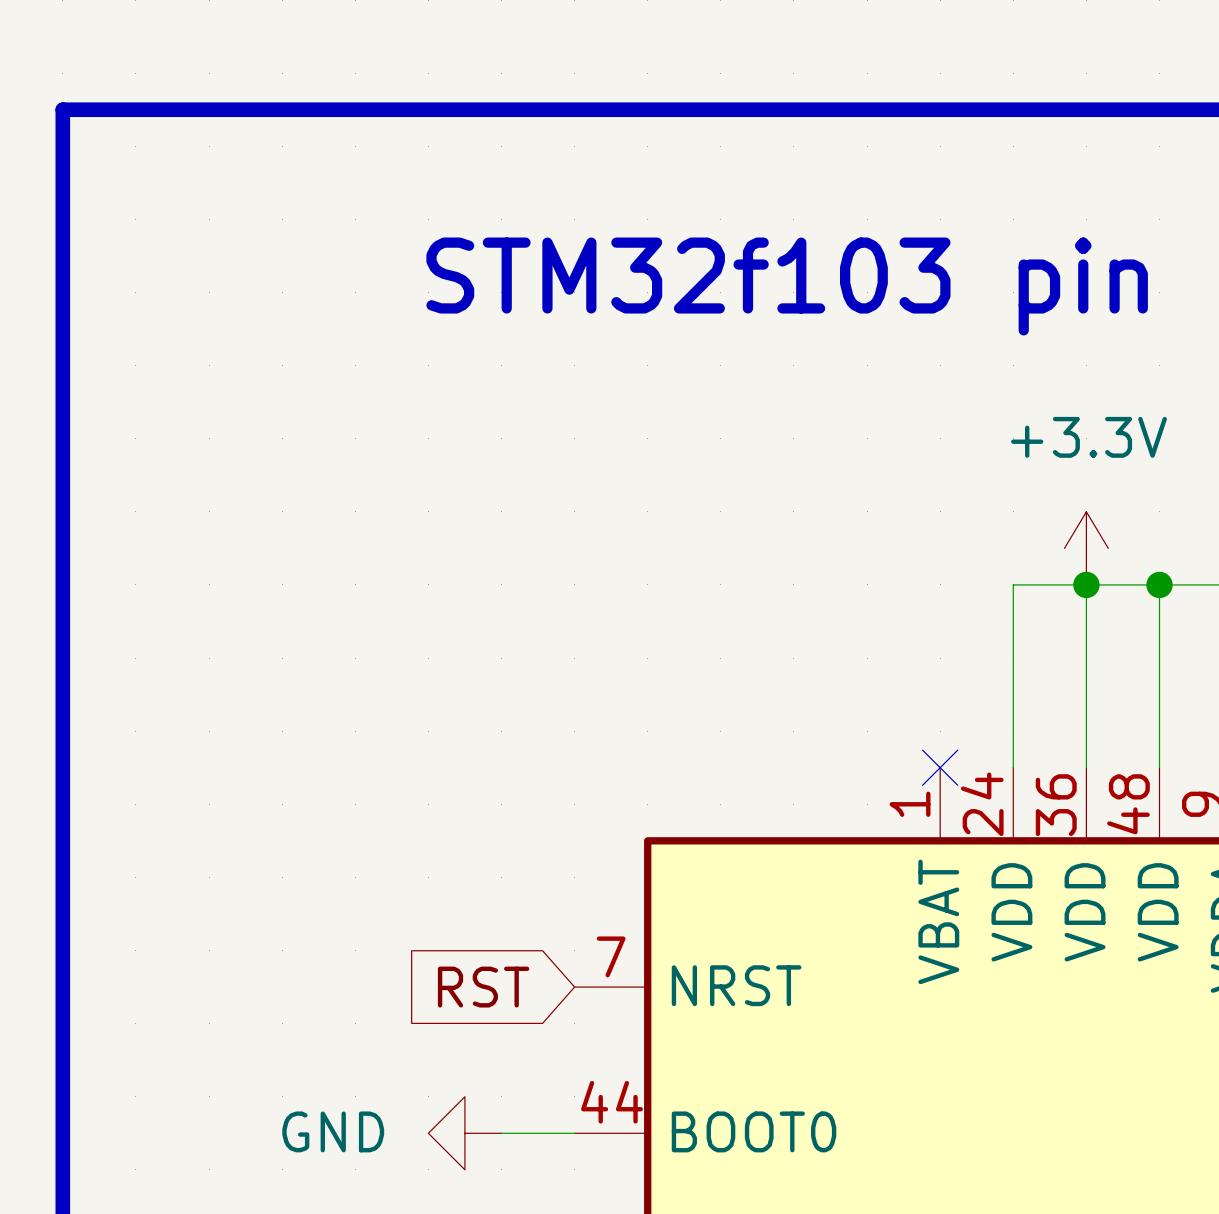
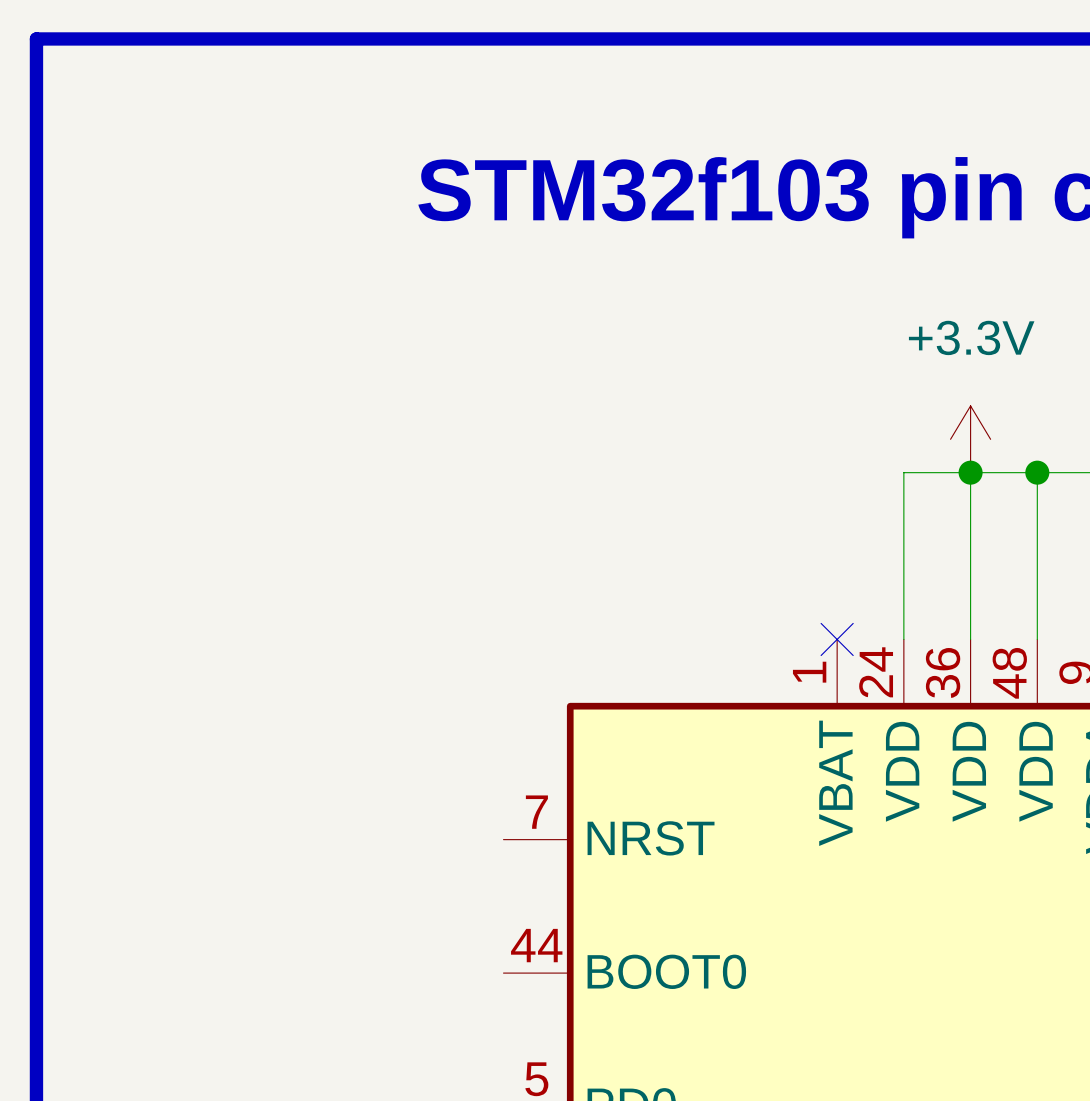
global label: RST (483, 987) -> none
power symbol: GND (464, 1133) -> none
wire: (501, 1133) (574, 1133) -> none

